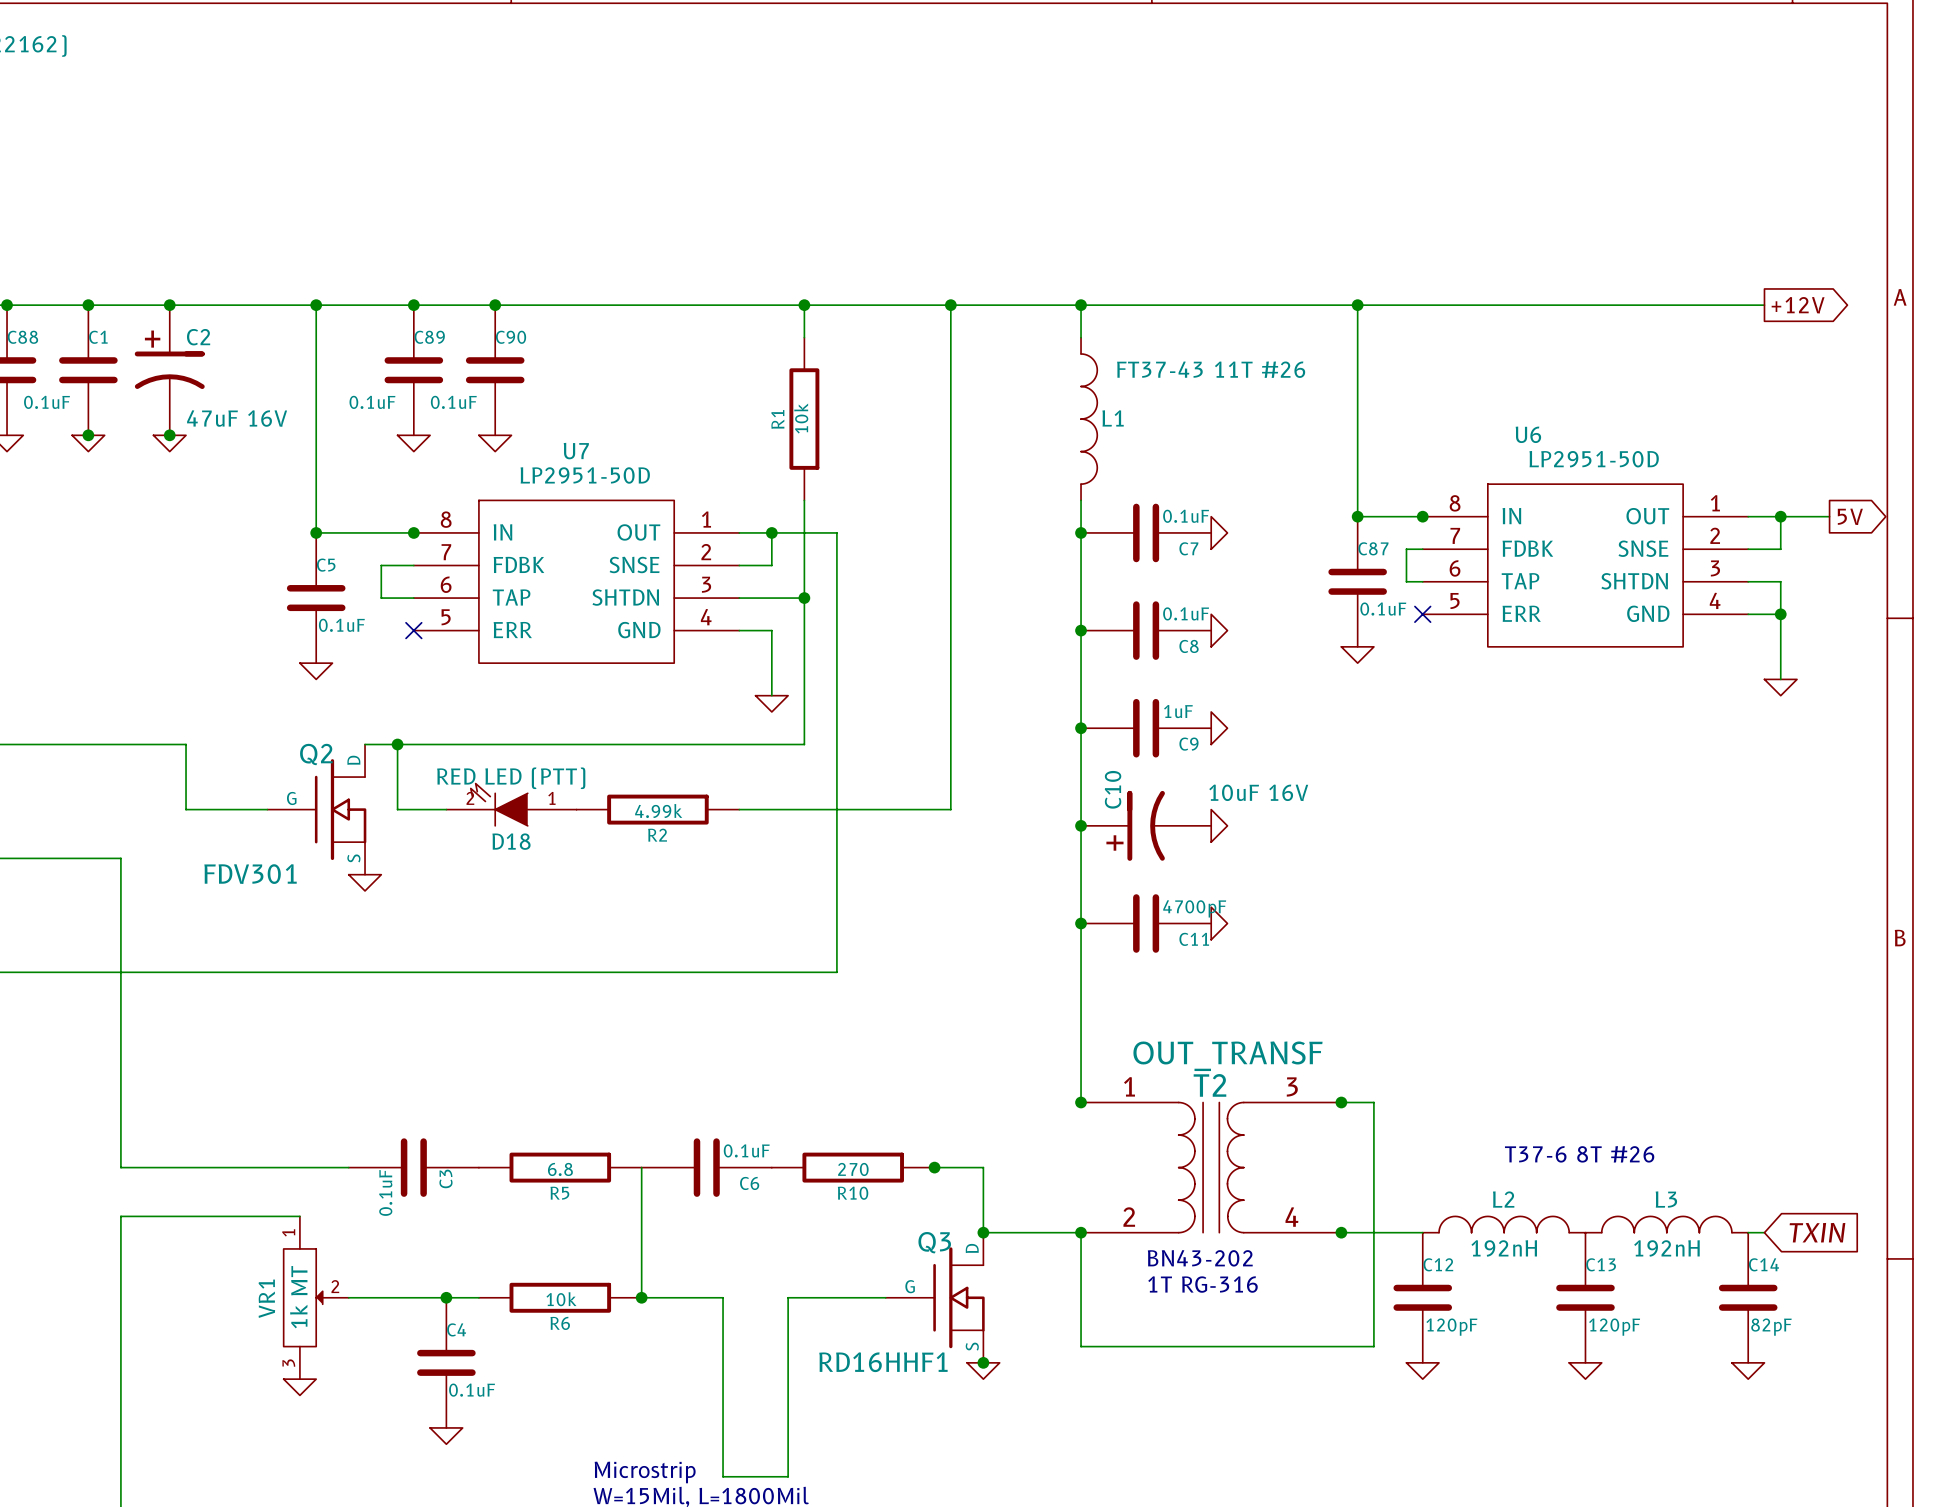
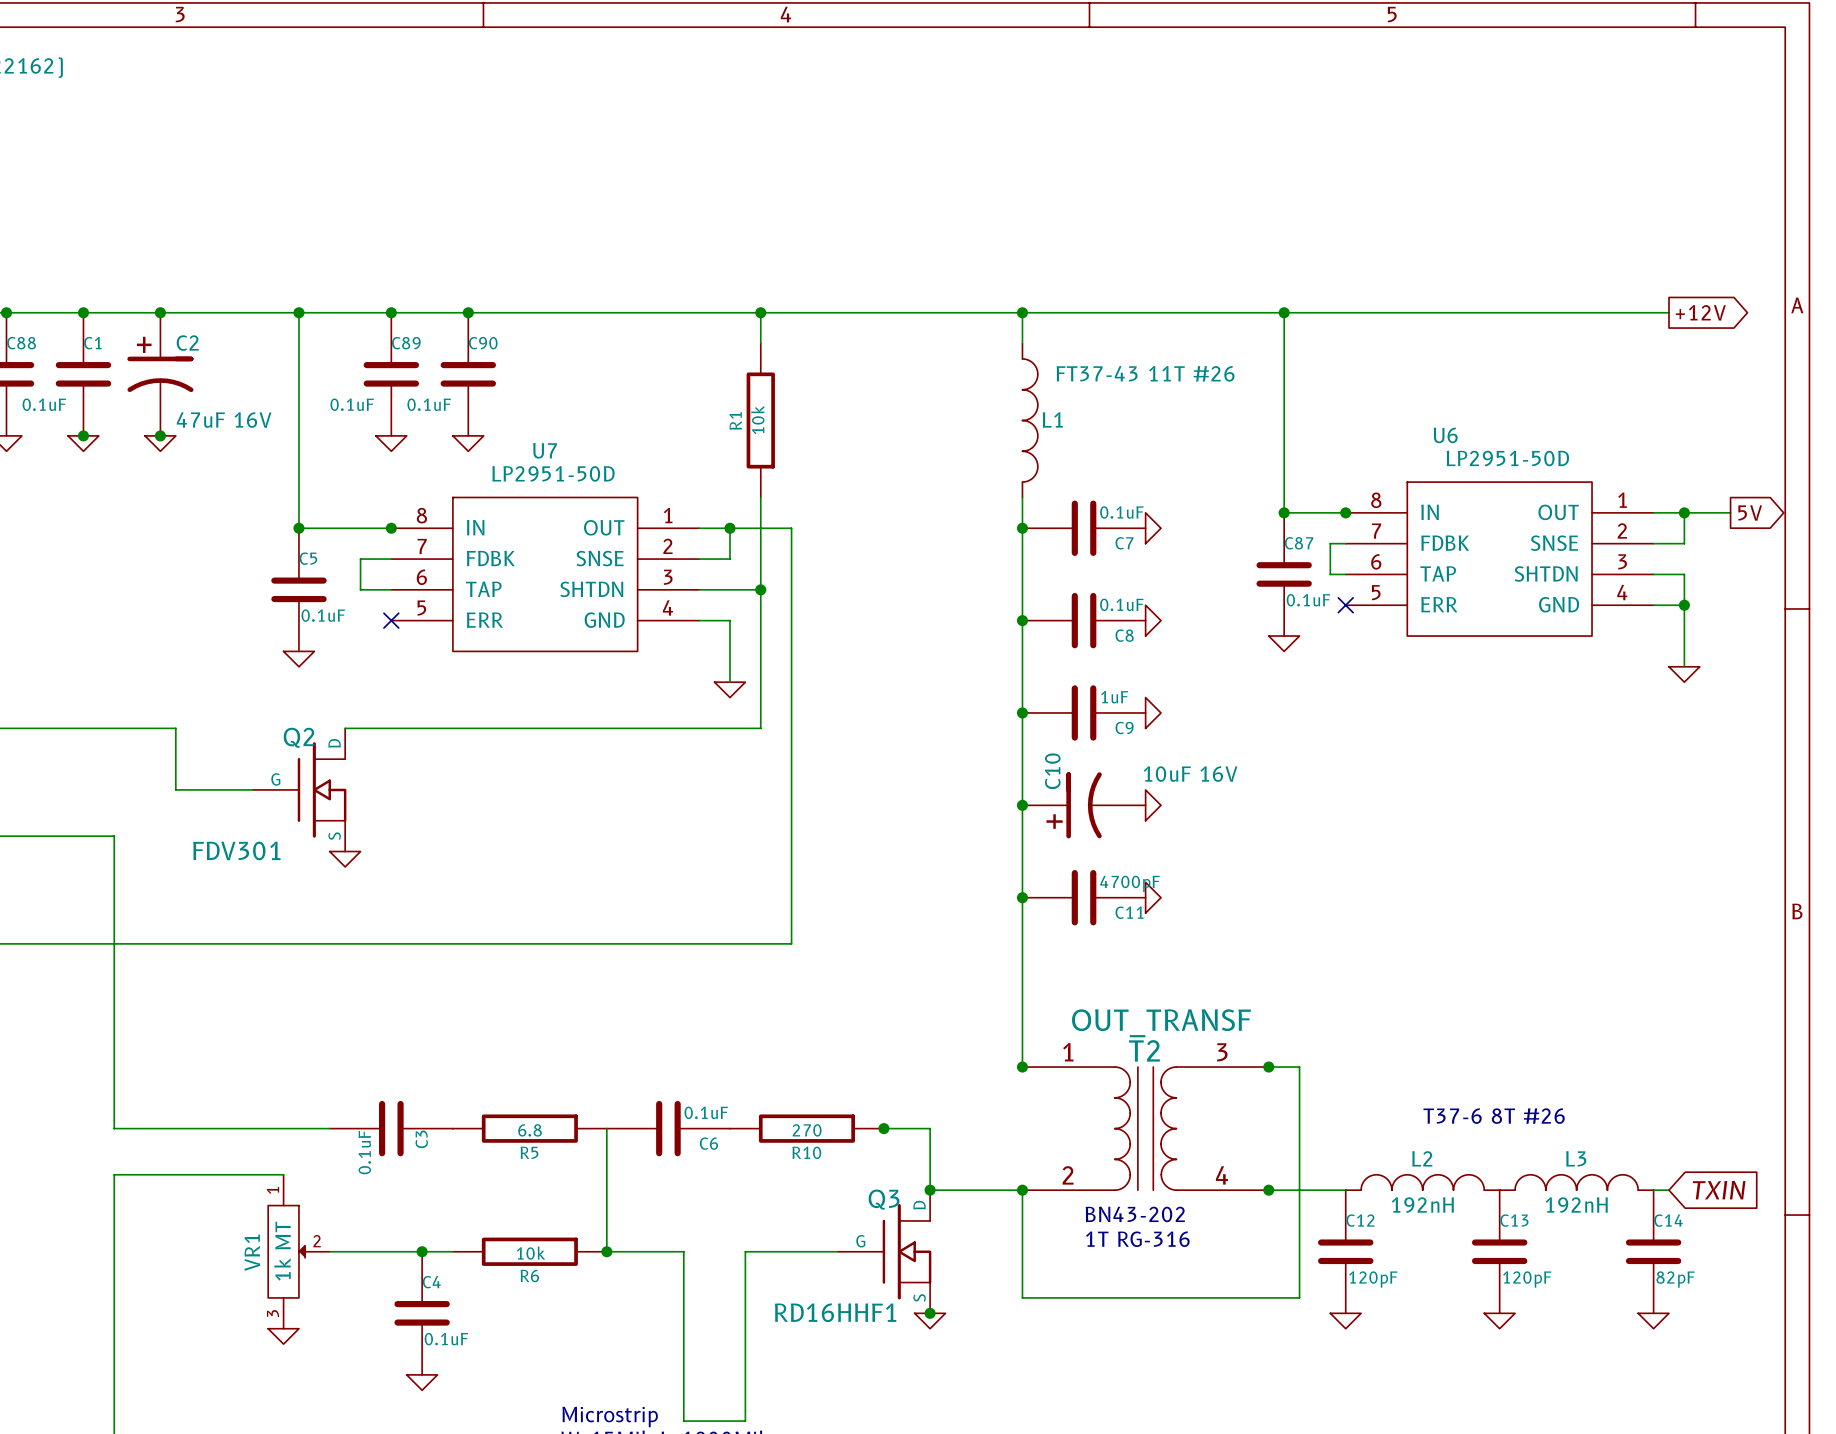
wire: (950, 305) (950, 809) (739, 809) -> none
junction: (950, 305) -> none
wire: (397, 744) (397, 809) (446, 809) -> none
junction: (397, 744) -> none
D18: RED LED (PTT) (511, 804) -> none
R2: 4.99k (657, 809) -> none

